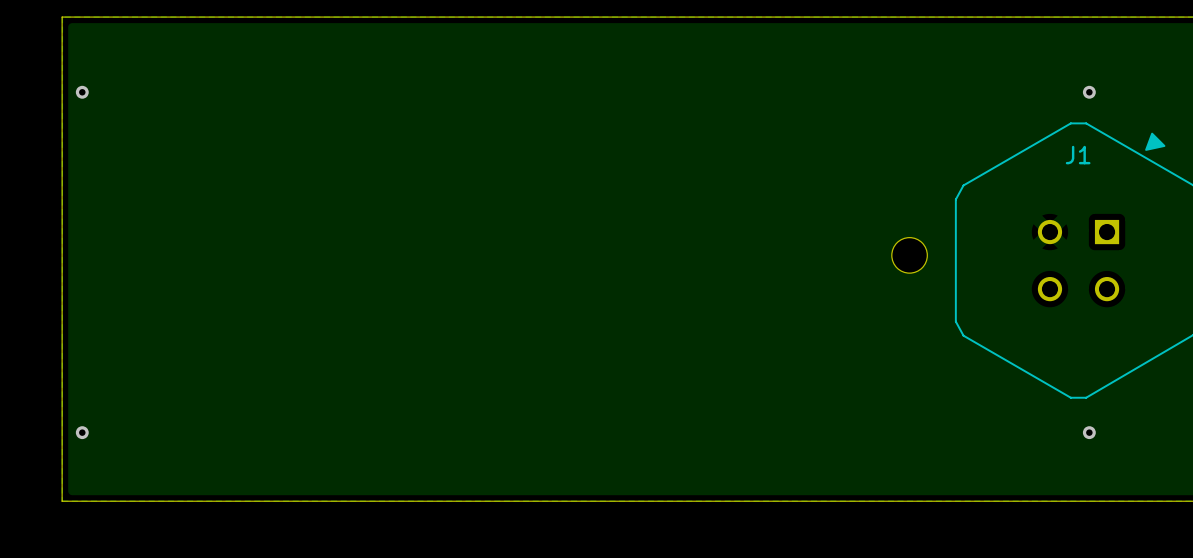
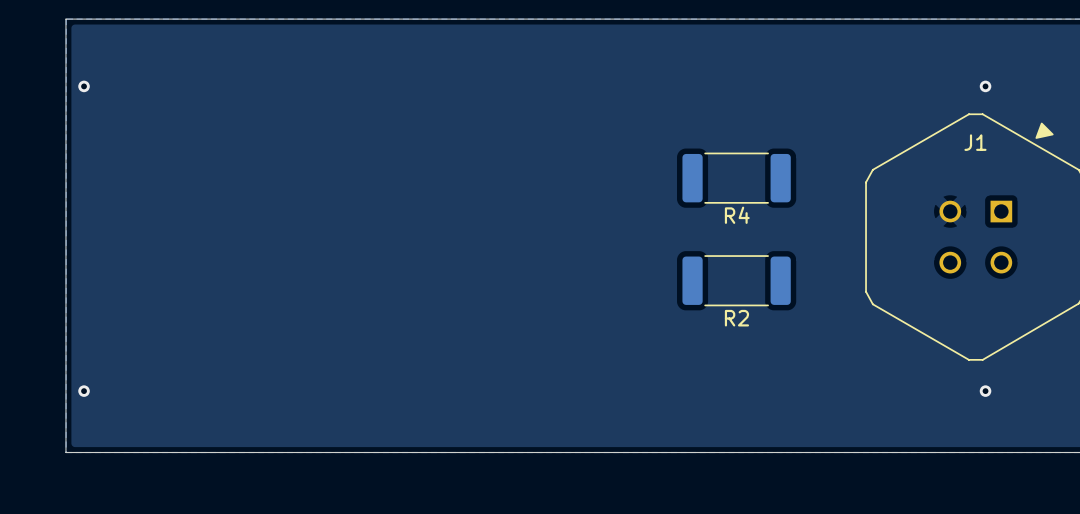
R4: none -> (736, 178)
part: (909, 255) -> none
R2: none -> (736, 280)

